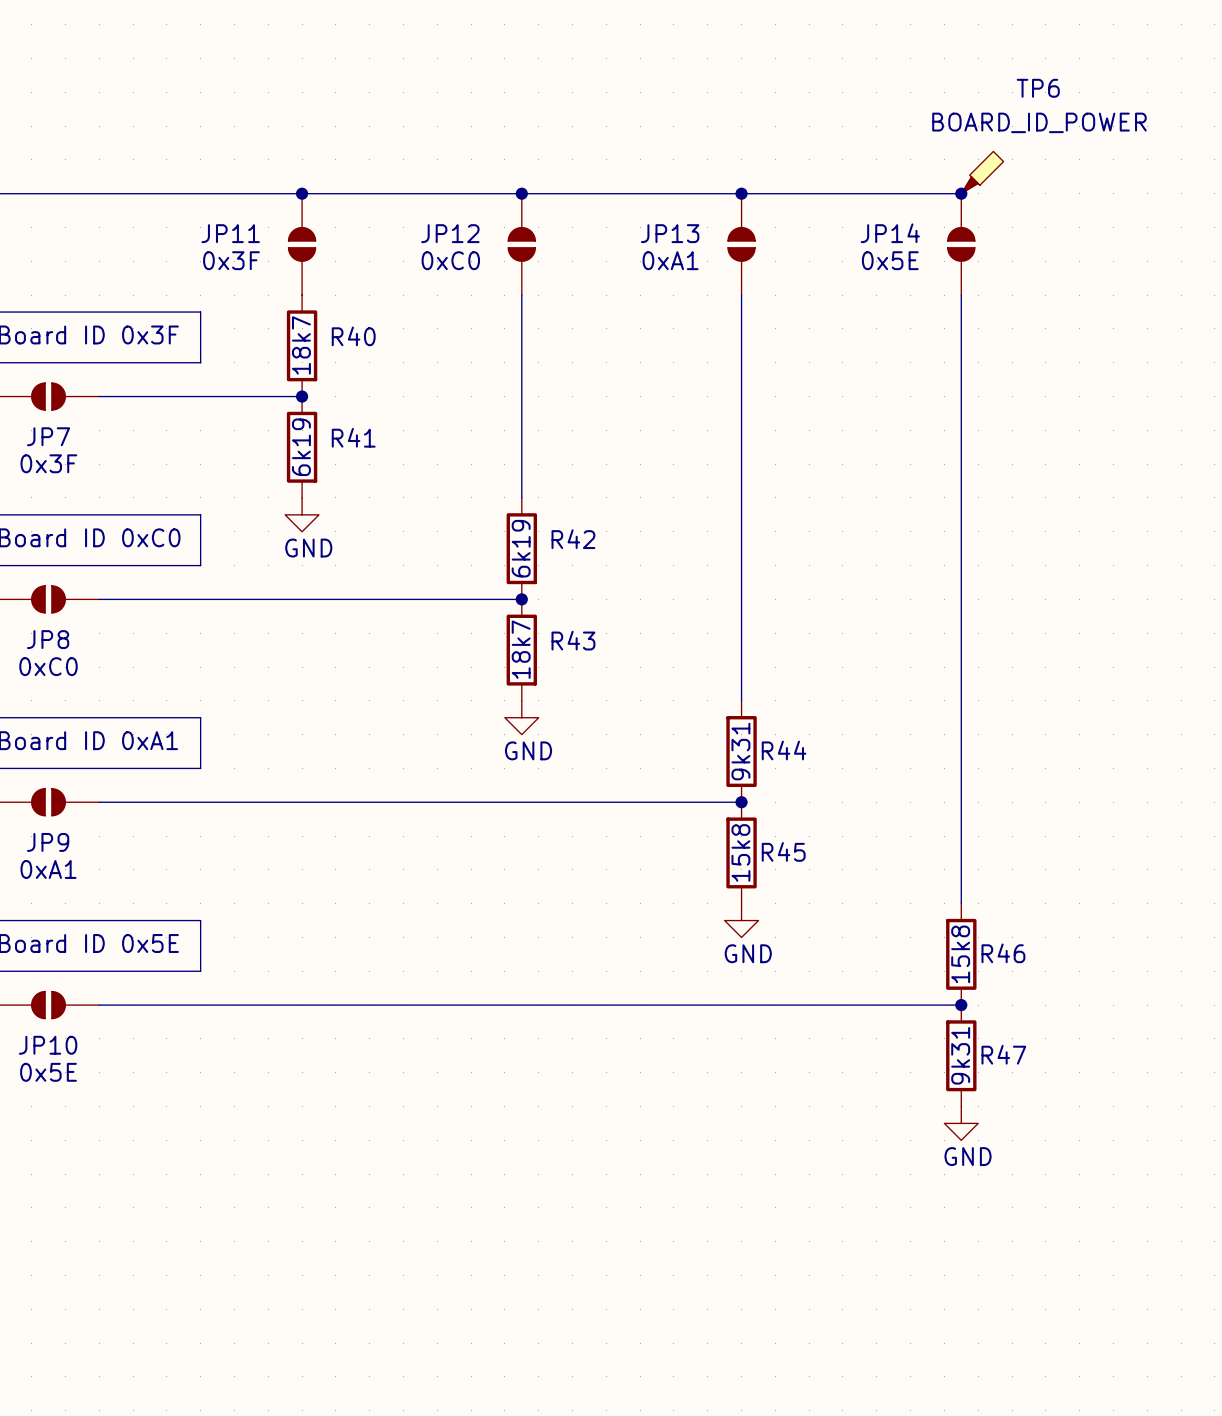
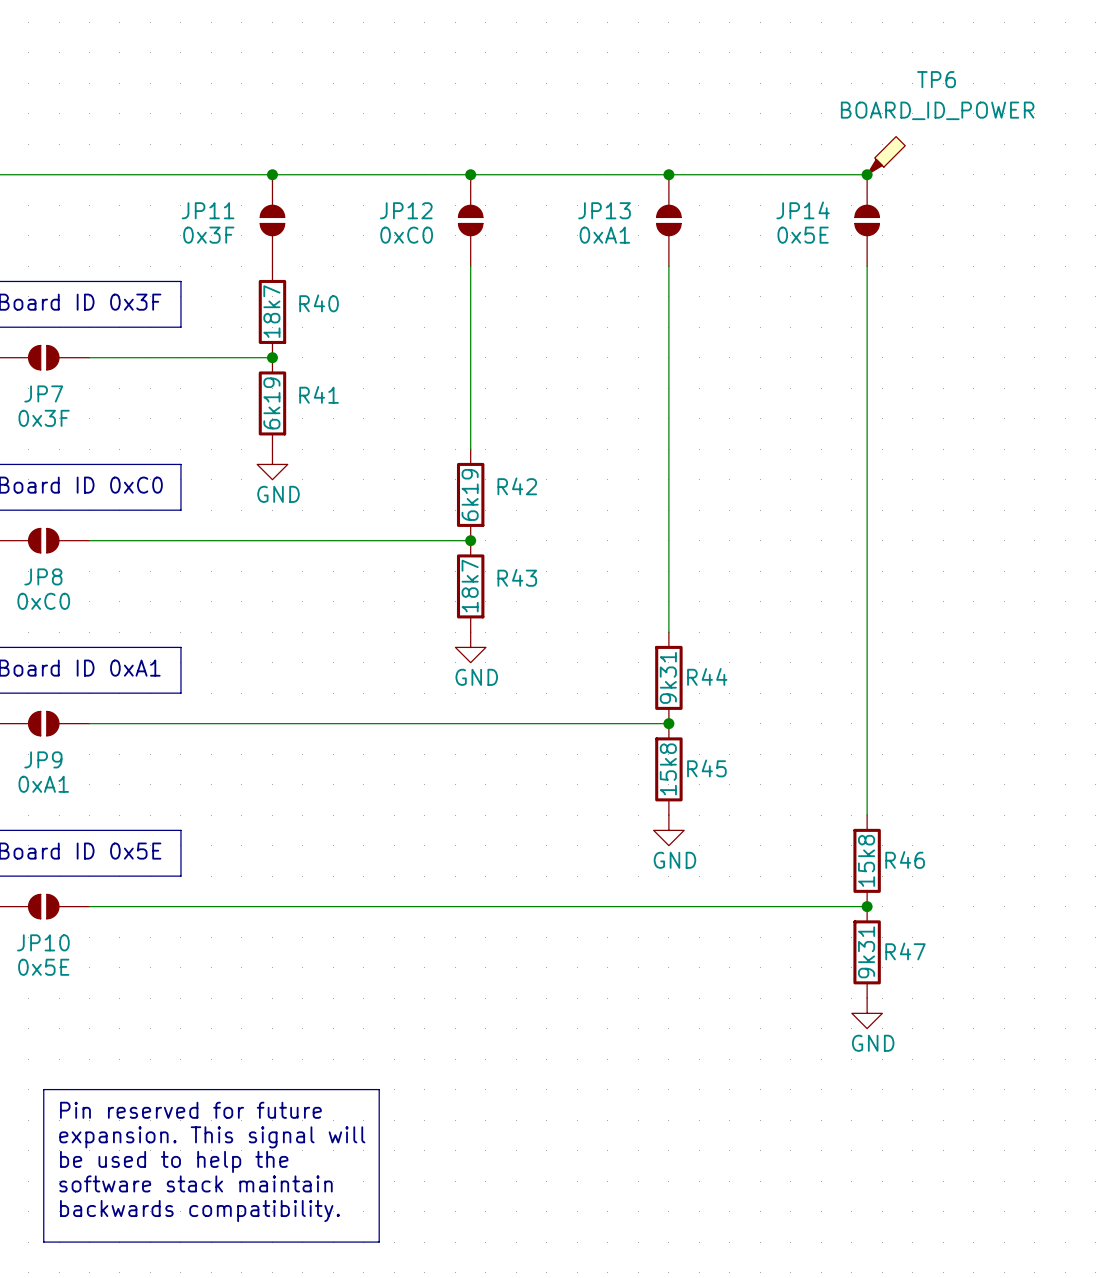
line: none -> (43, 1089) (379, 1089) (379, 1242) (43, 1242) (43, 1089)
text: none -> Pin reserved for future (190, 1110)
text: none -> expansion. This signal will (212, 1137)
text: none -> be used to help the (174, 1161)
text: none -> software stack maintain (195, 1183)
text: none -> backwards compatibility. (199, 1211)

